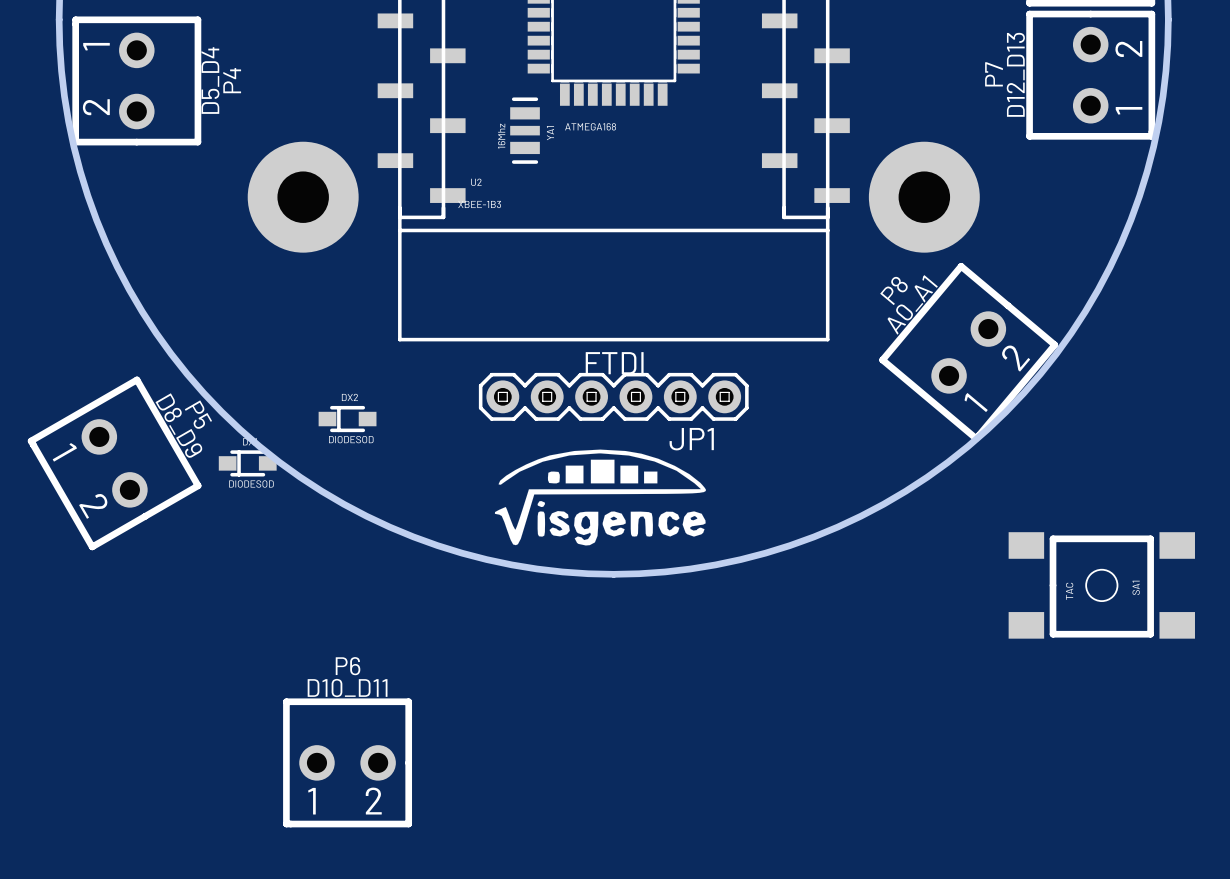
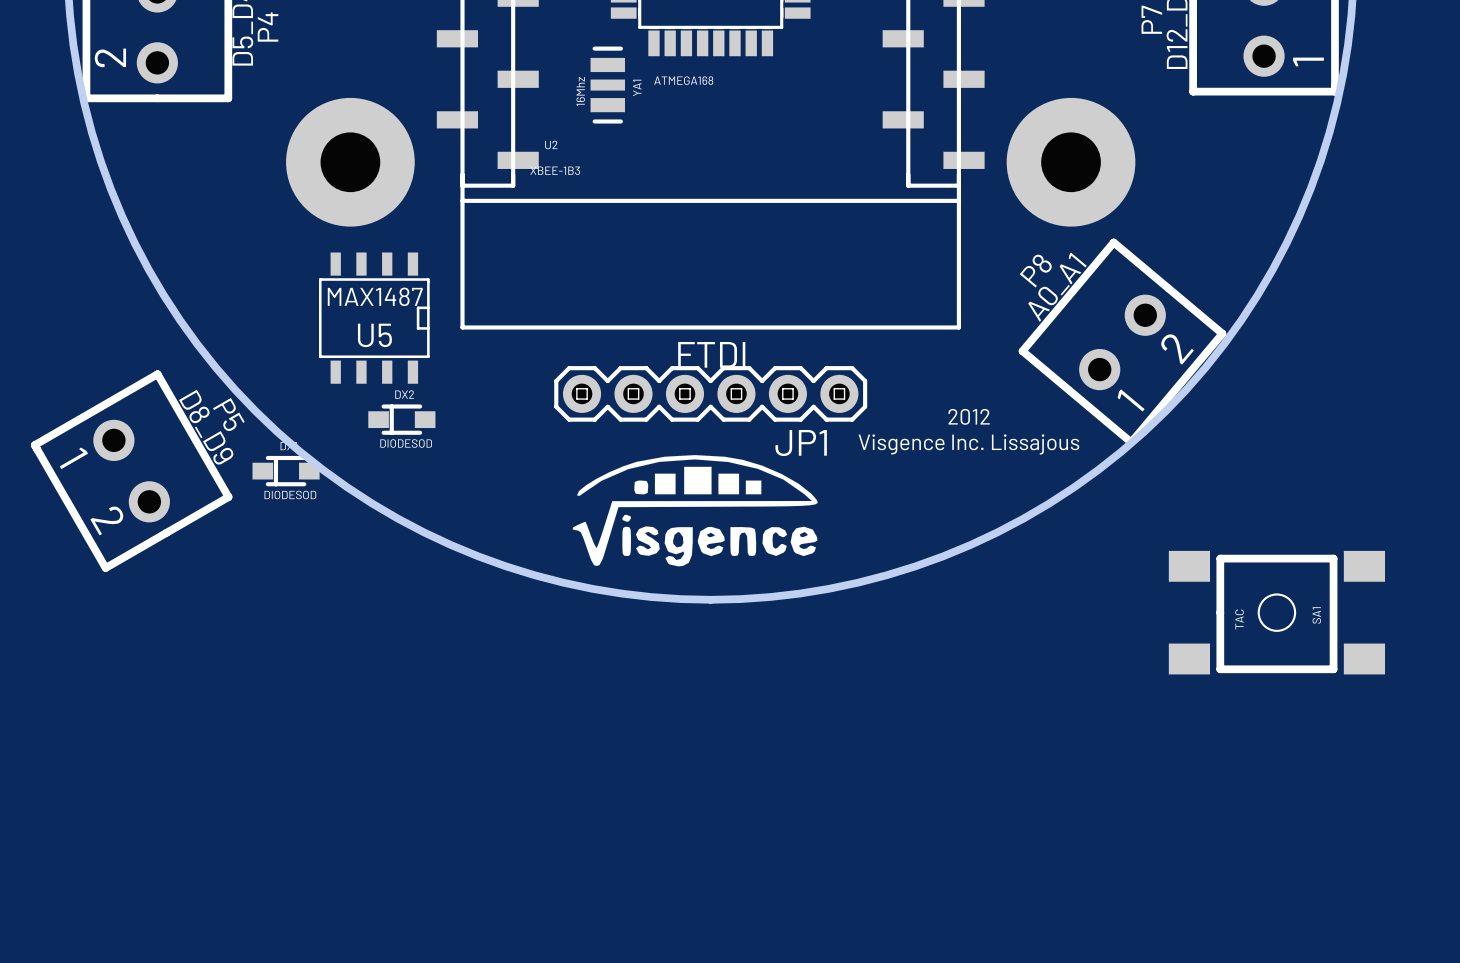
U5: none -> MAX1487 (374, 318)
text: none -> 2012 (969, 416)
text: none -> Visgence Inc. Lissajous (968, 444)
P6: D10_D11 (347, 762) -> none

